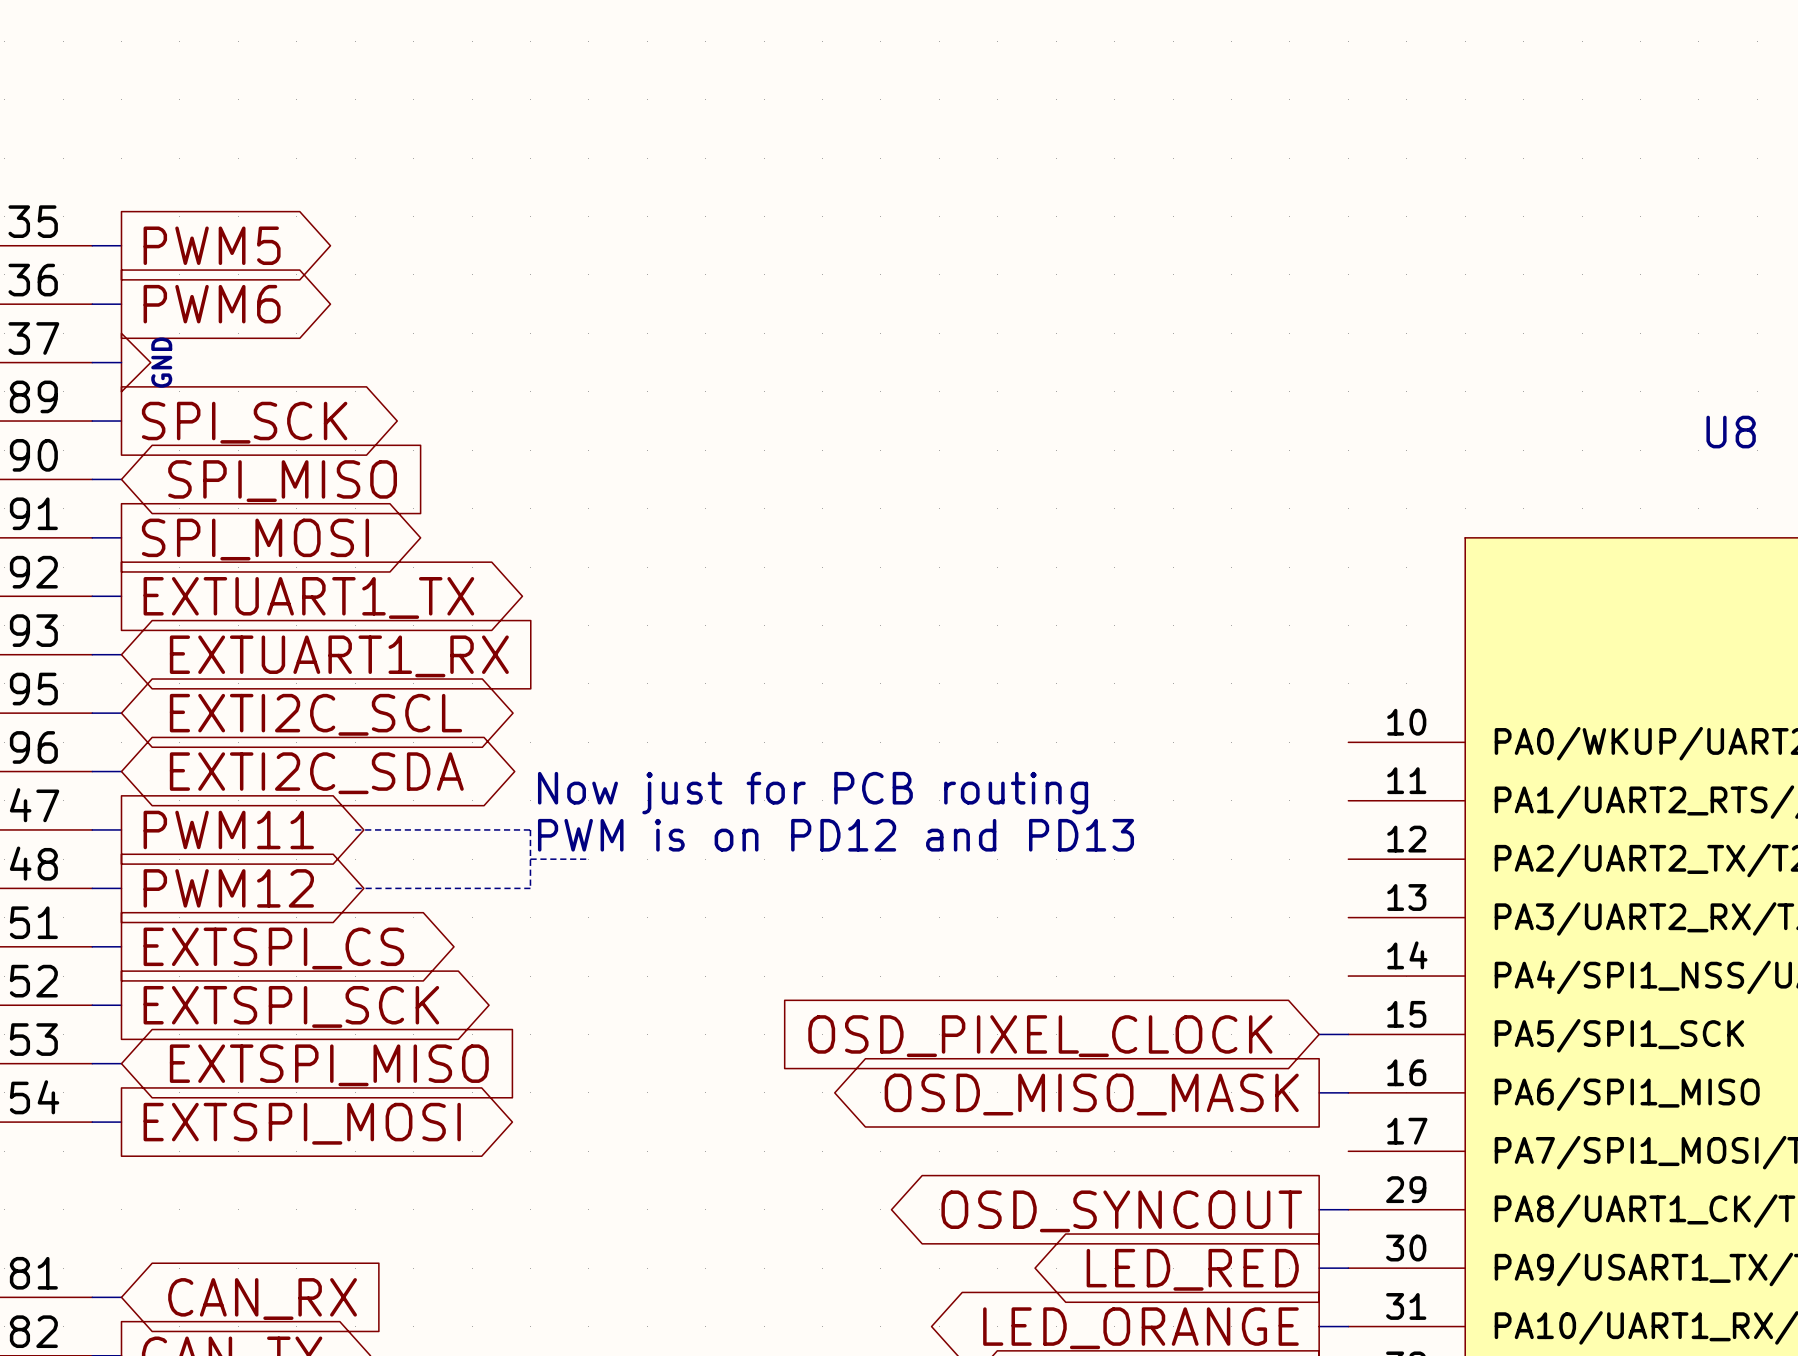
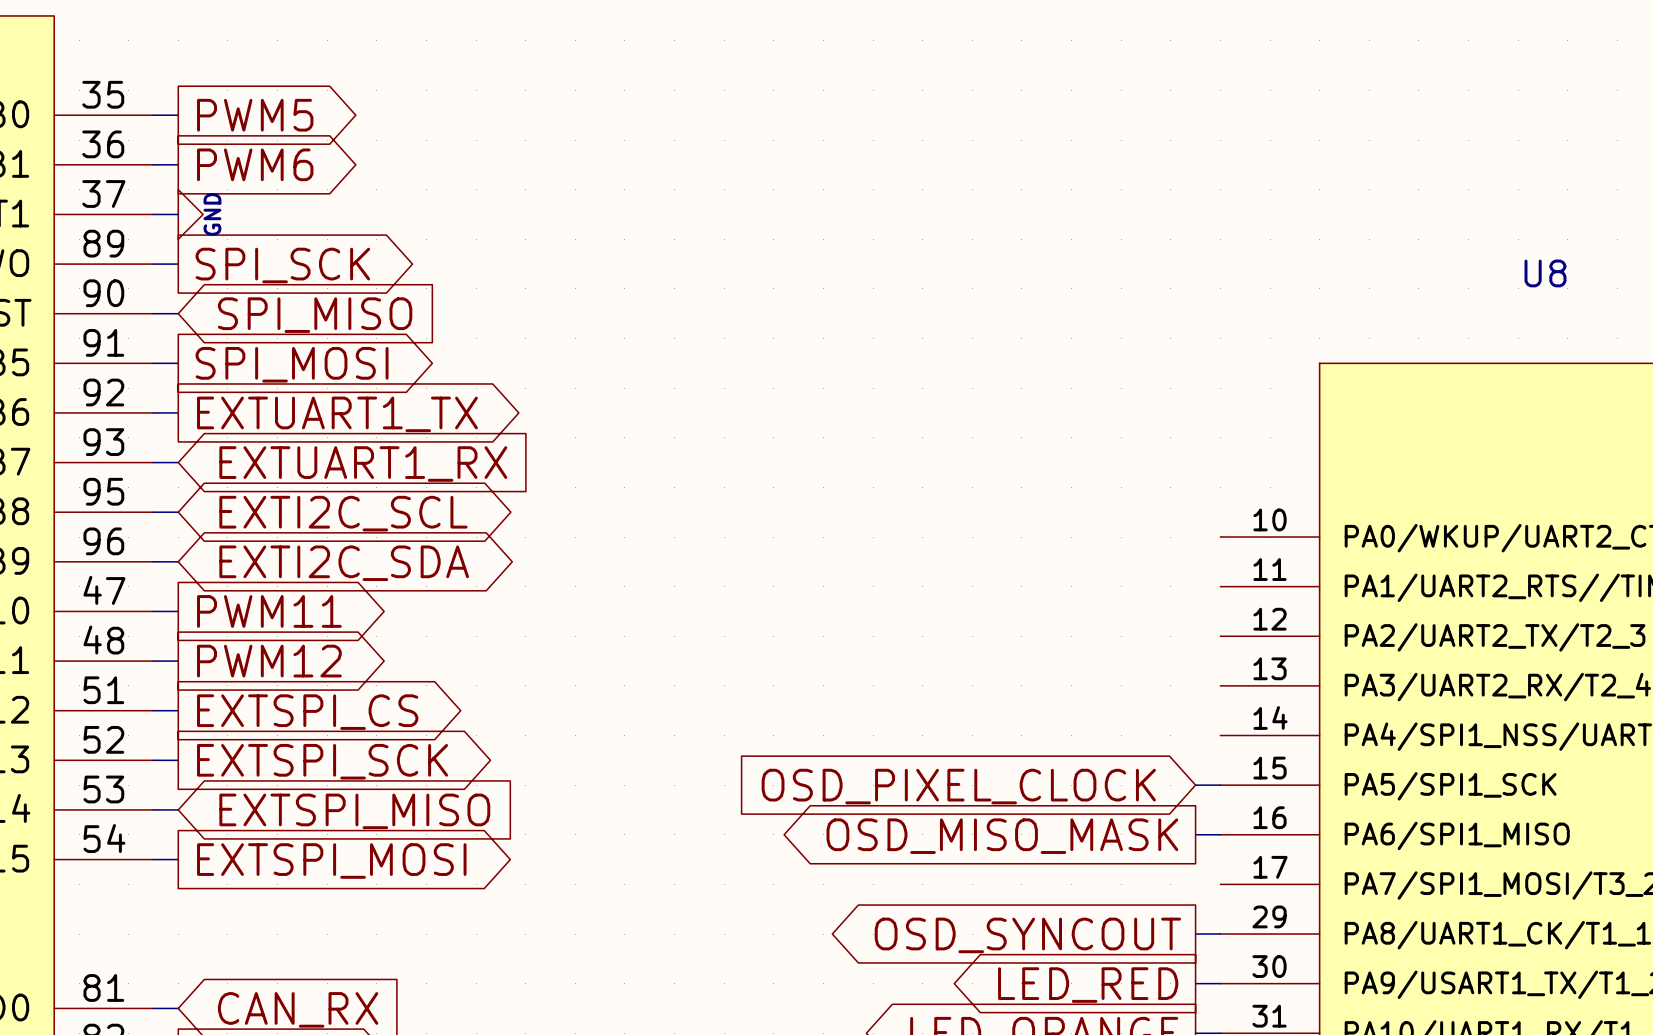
text: Now just for PCB routing (813, 793) -> none
line: (355, 829) (530, 829) (530, 888) (355, 888) -> none
text: PWM is on PD12 and PD13 (835, 835) -> none
line: (530, 859) (588, 859) -> none

